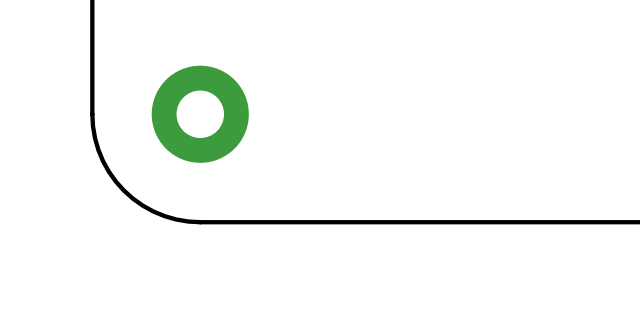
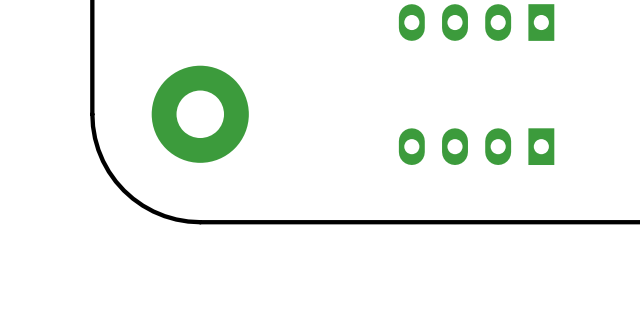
part: none -> (476, 22)
part: none -> (476, 146)

